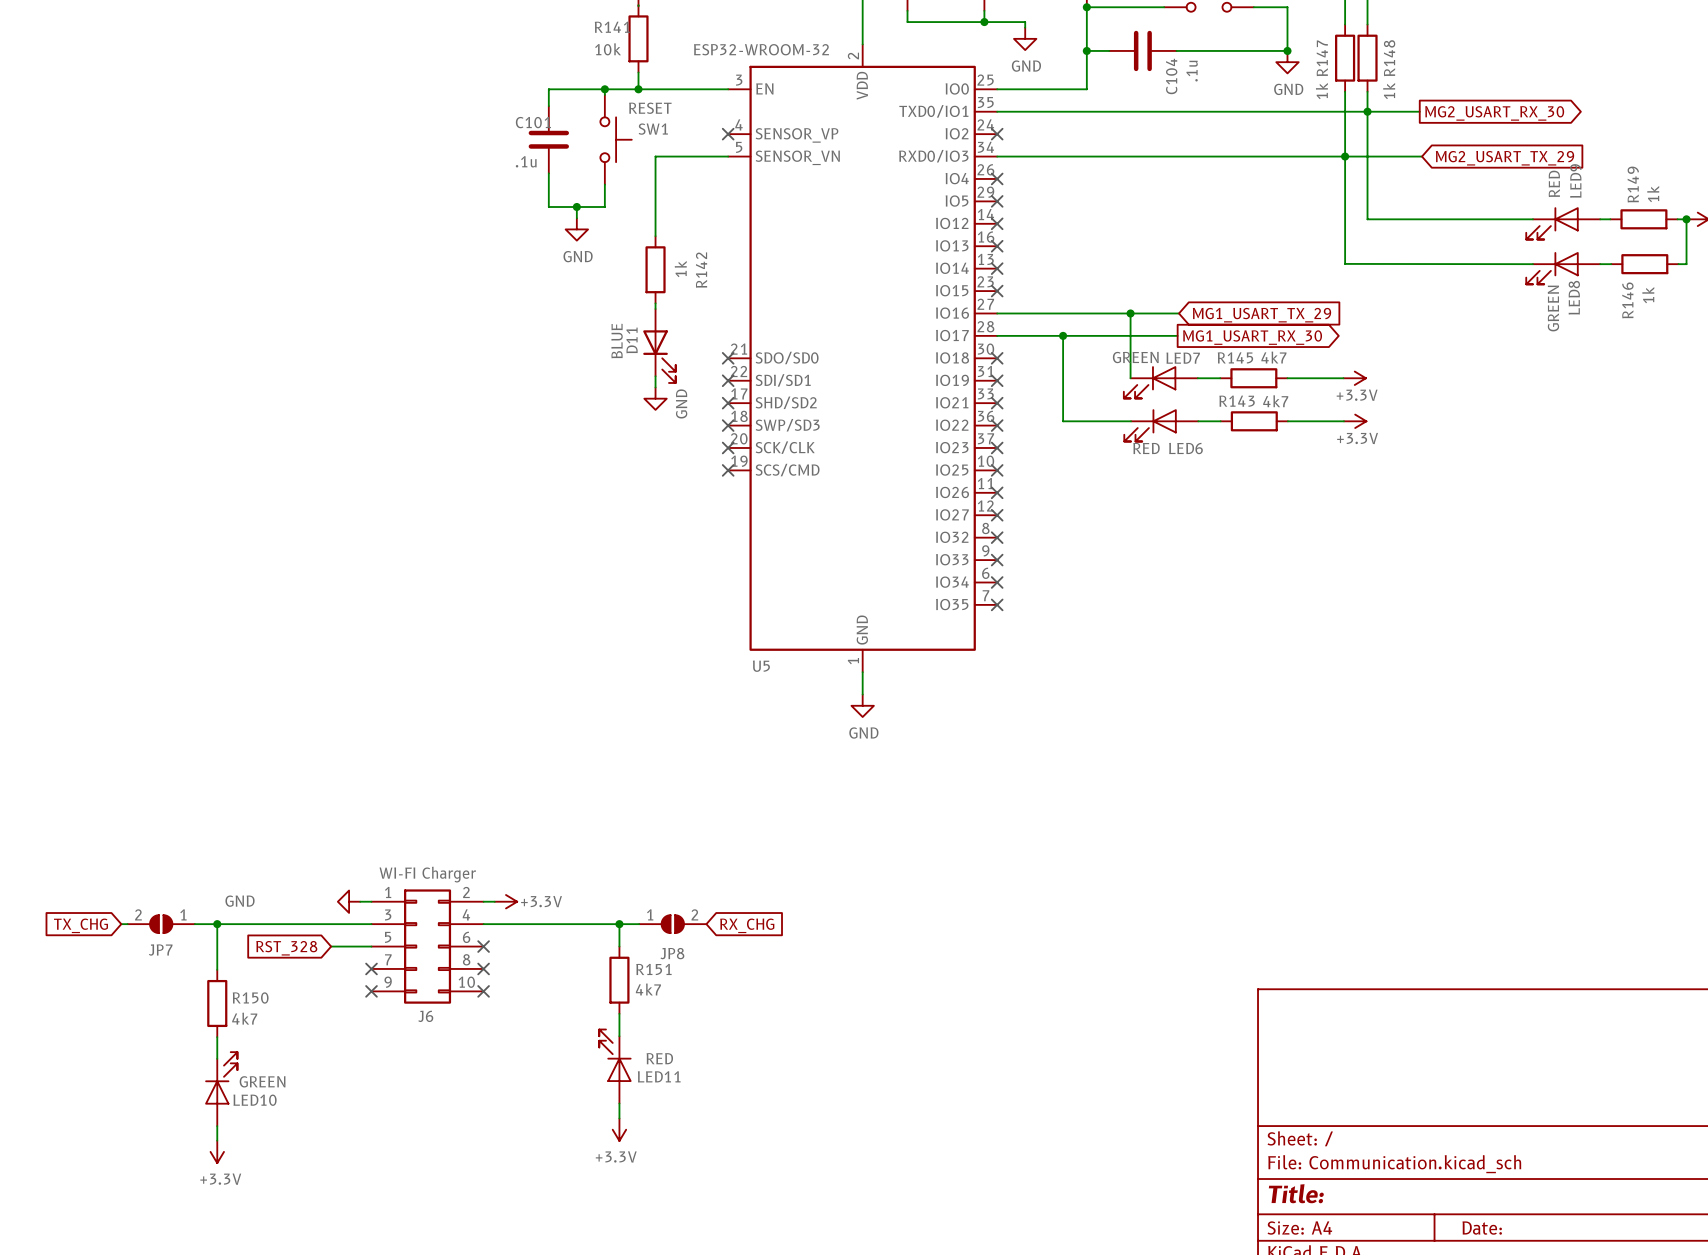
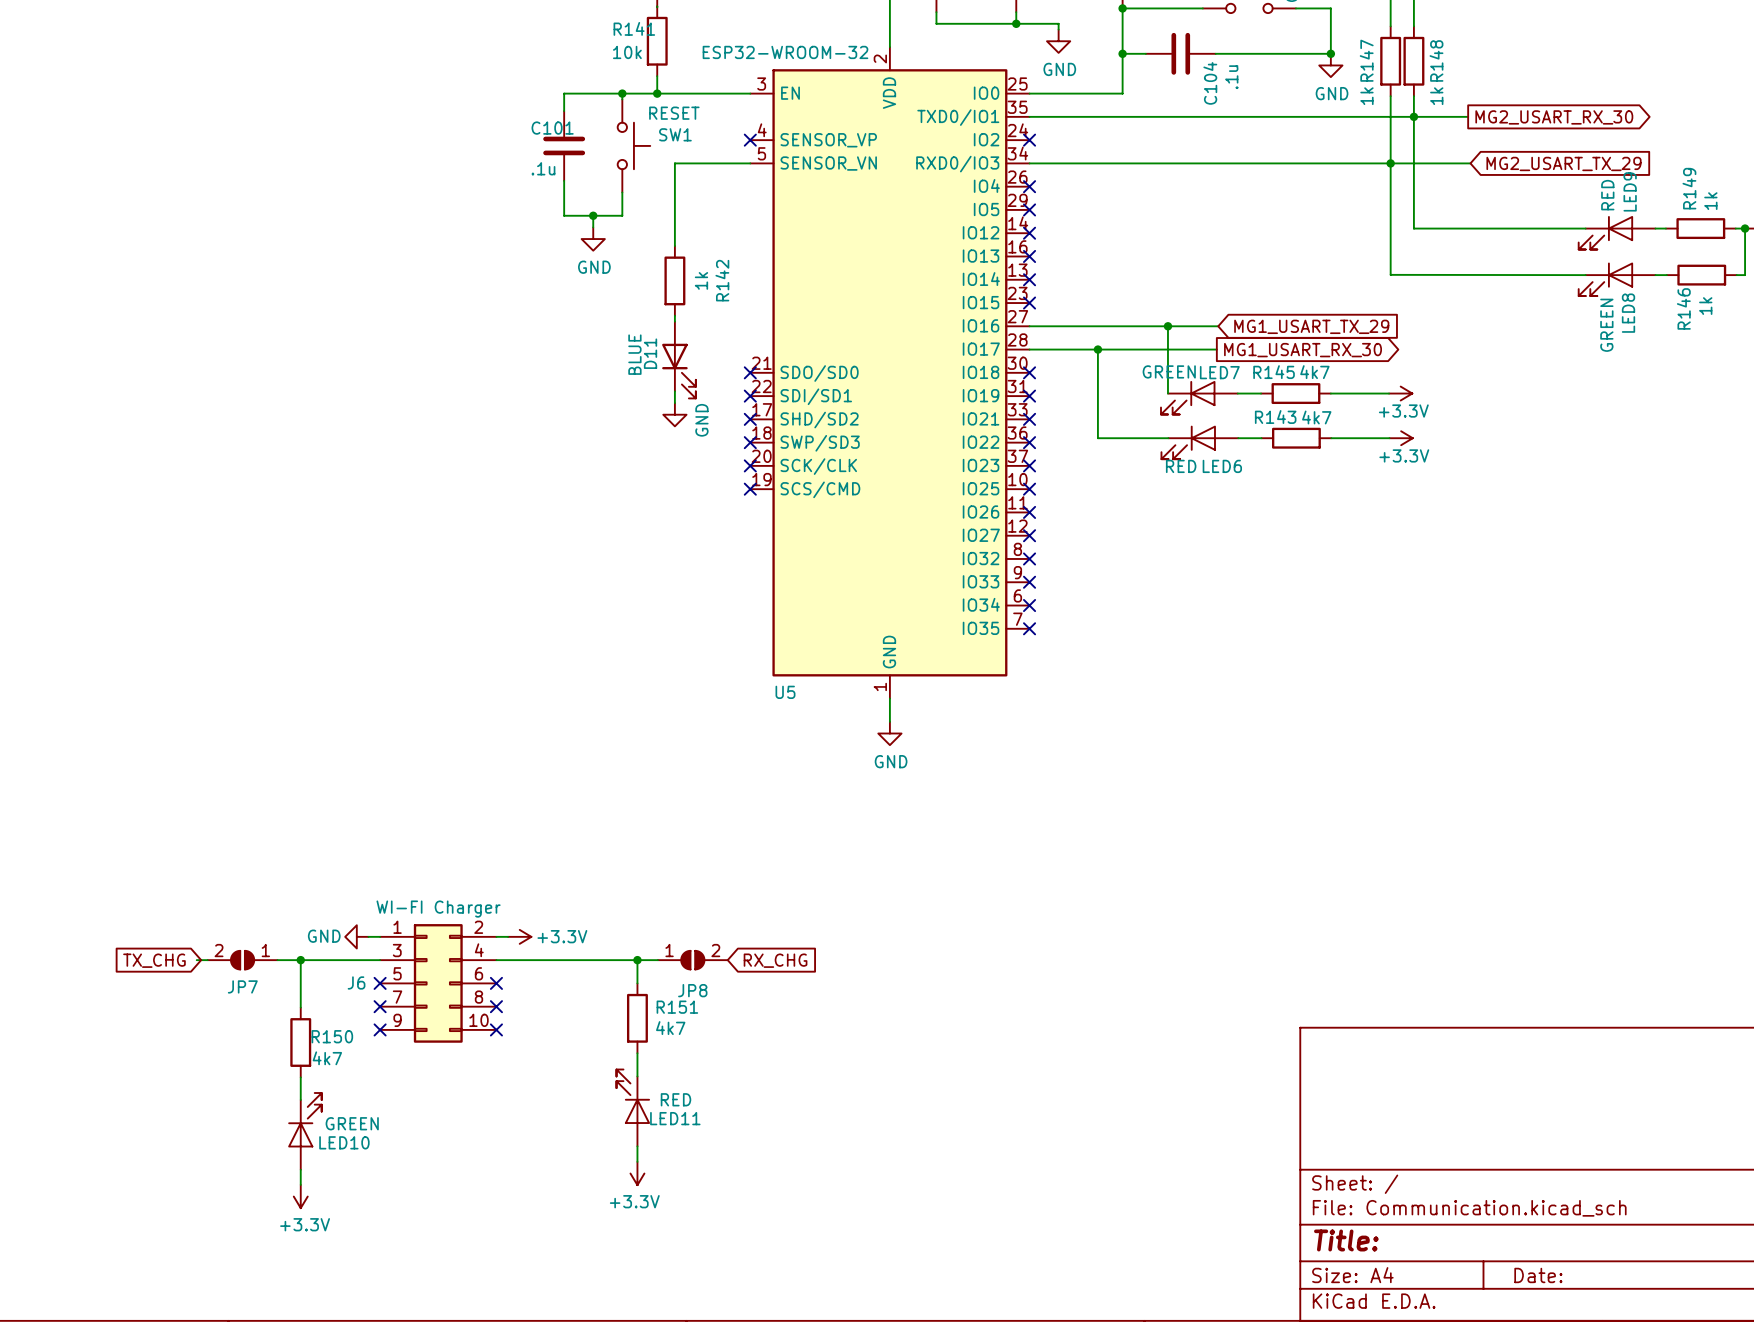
power symbol text position: GND (240, 901) -> GND (324, 936)
wire: (121, 924) (127, 924) -> none
JP7 position: (161, 924) -> (242, 960)
wire: (217, 924) (217, 969) -> (300, 960) (300, 1007)
junction: (217, 924) -> none
junction: none -> (300, 960)
global label position: TX_CHG (80, 925) -> TX_CHG (154, 960)
wire: (331, 946) (371, 946) -> none
no-connect mark: none -> (380, 983)
global label: RST_328 (286, 948) -> none
R150 position: (217, 1003) -> (300, 1042)
J6 name position: J6 (425, 1016) -> J6 (356, 982)
wire: (217, 1037) (217, 1058) -> (300, 1077) (300, 1099)
LED10 position: (221, 1089) -> (304, 1131)
wire: (217, 1126) (217, 1140) -> (300, 1169) (300, 1184)
power symbol position: +3.3V (217, 1151) -> +3.3V (300, 1196)

